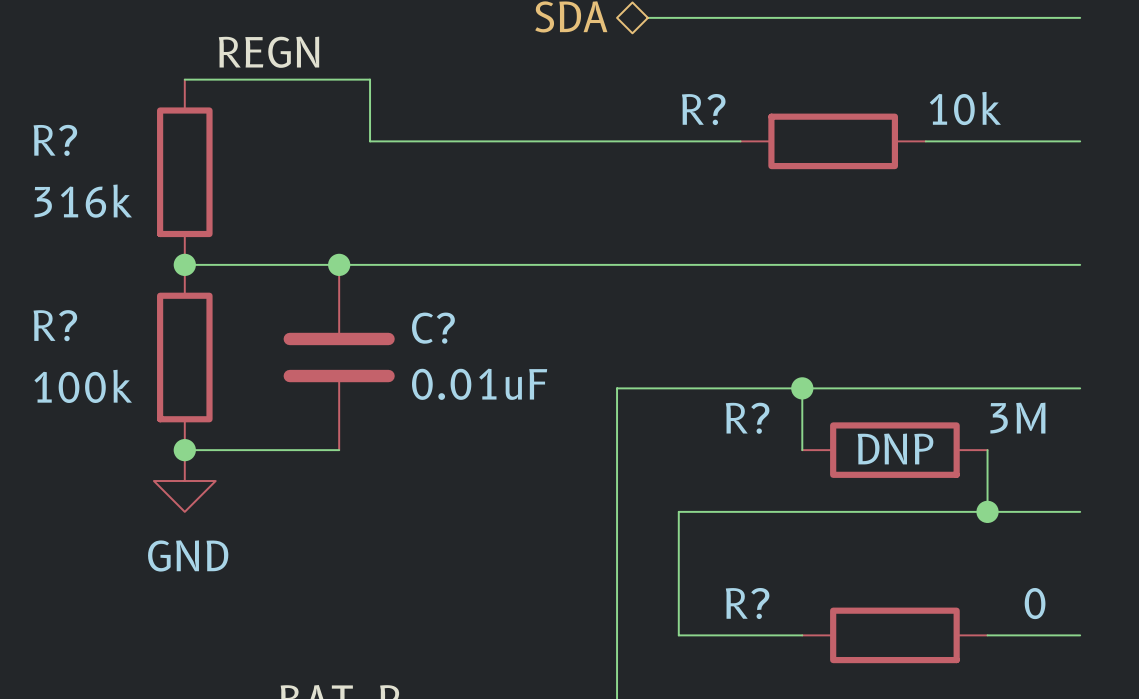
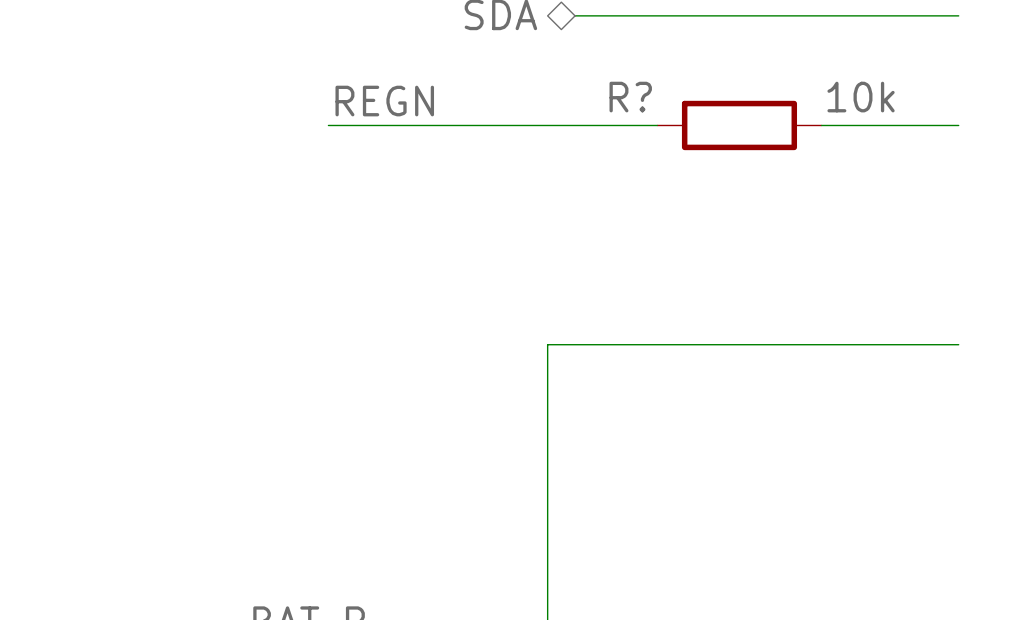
label position: REGN (268, 52) -> REGN (384, 101)
wire: (184, 79) (370, 79) (370, 141) -> none
R?: 316k (184, 172) -> none
wire: (184, 264) (1080, 264) -> none
junction: (184, 264) -> none
junction: (339, 264) -> none
R?: 100k (184, 357) -> none
C?: 0.01uF (339, 357) -> none
wire: (802, 388) (802, 450) -> none
junction: (802, 388) -> none
wire: (184, 450) (339, 450) -> none
junction: (184, 450) -> none
R?: 3M (894, 450) -> none
wire: (987, 450) (987, 511) -> none
power symbol: GND (184, 481) -> none
junction: (987, 511) -> none
wire: (1080, 511) (678, 511) (678, 635) (802, 635) -> none
R?: 0 (894, 635) -> none
wire: (987, 635) (1080, 635) -> none

